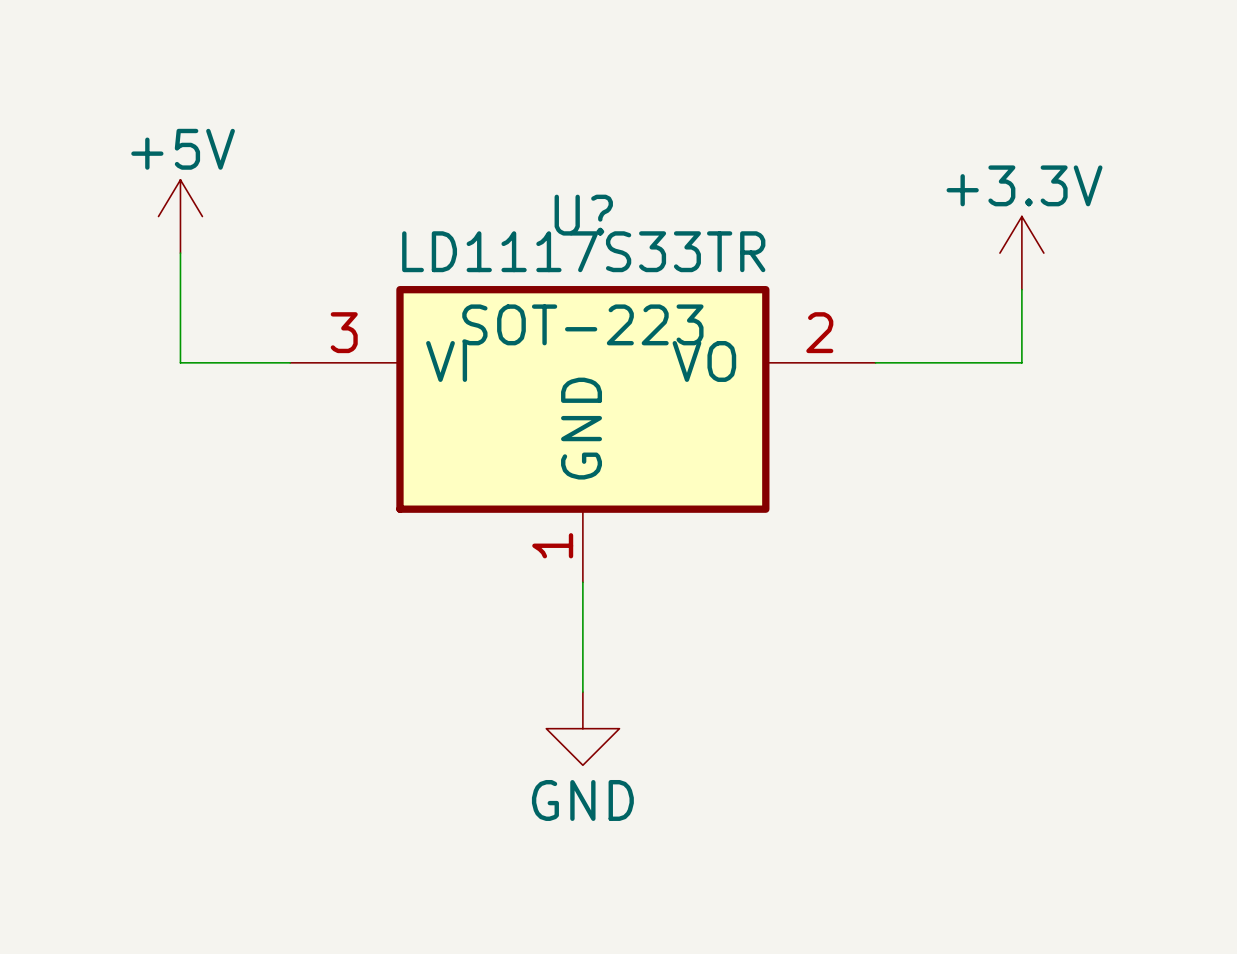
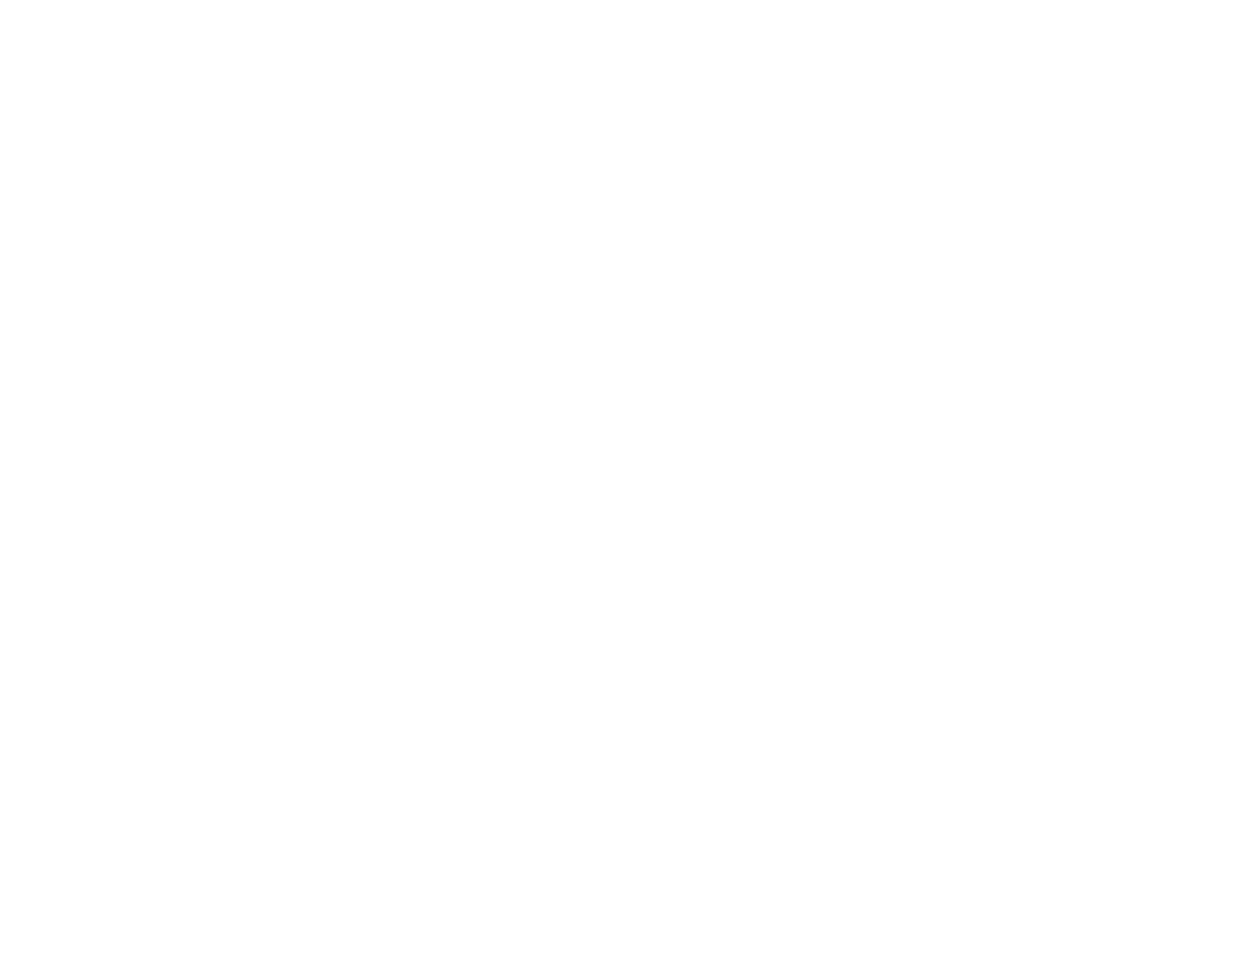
power symbol: +5V (180, 216) -> none
wire: (180, 253) (180, 362) (290, 362) -> none
power symbol: +3.3V (1021, 253) -> none
wire: (1021, 289) (1021, 362) (875, 362) -> none
U?: LD1117S33TR (582, 434) -> none
wire: (582, 582) (582, 692) -> none
power symbol: GND (582, 728) -> none

